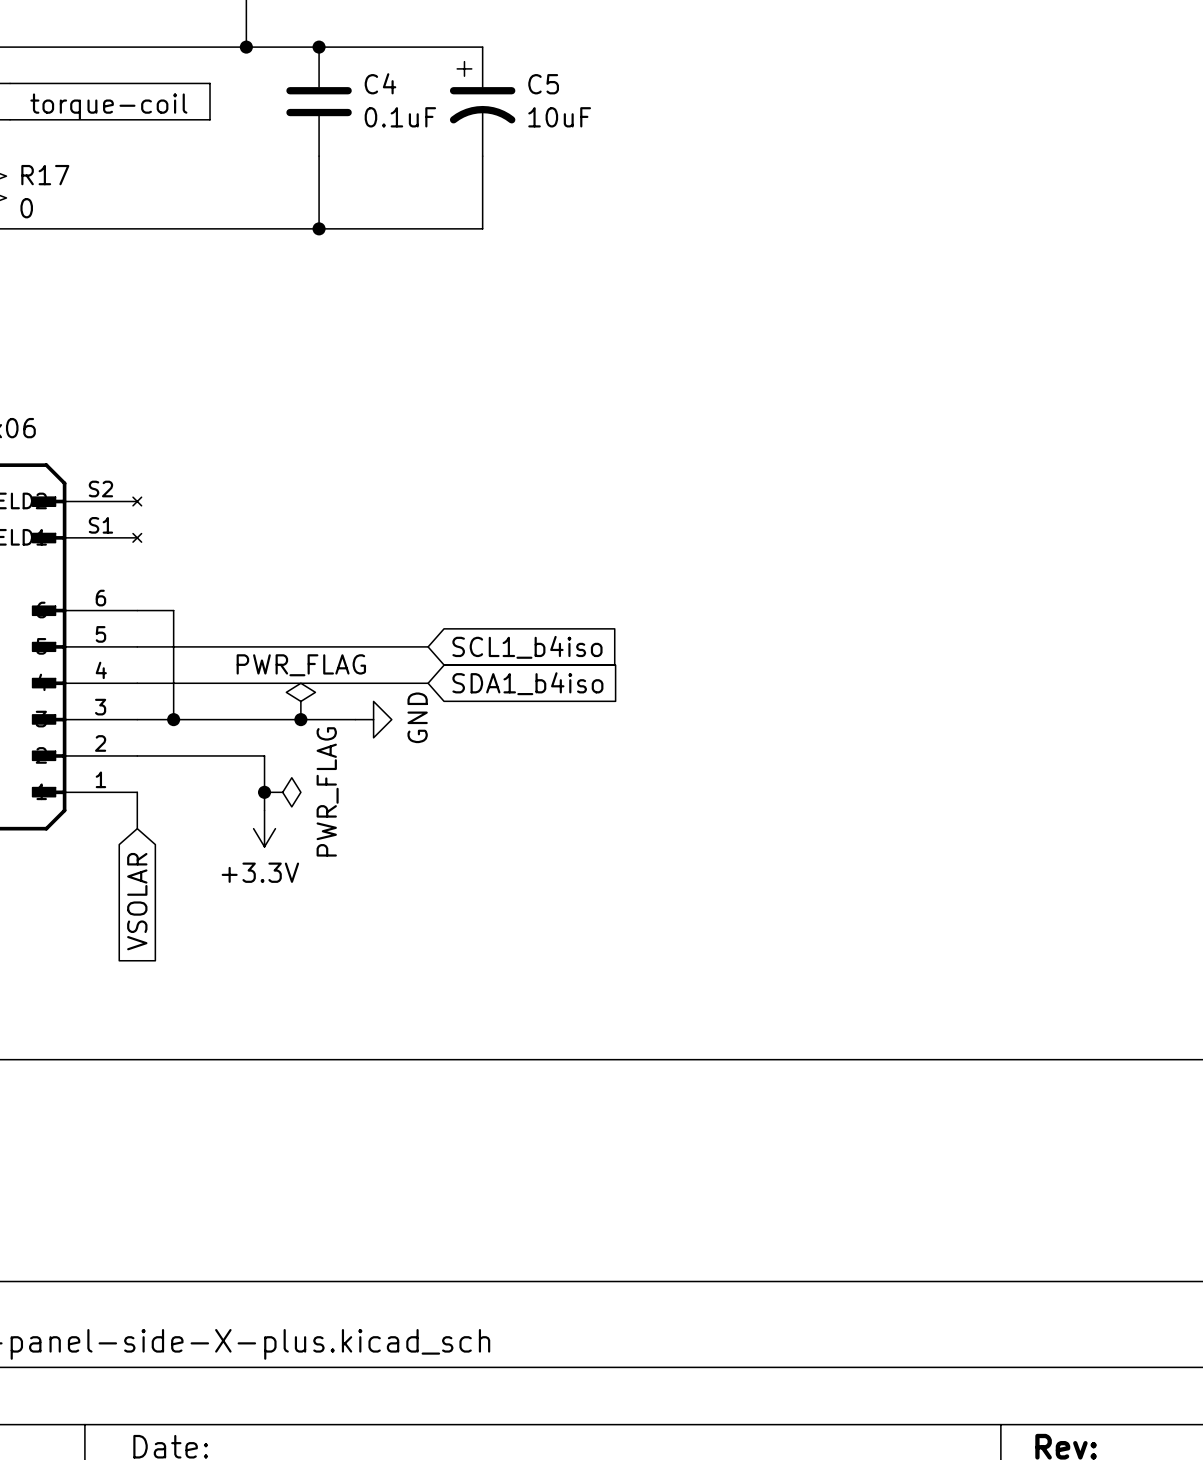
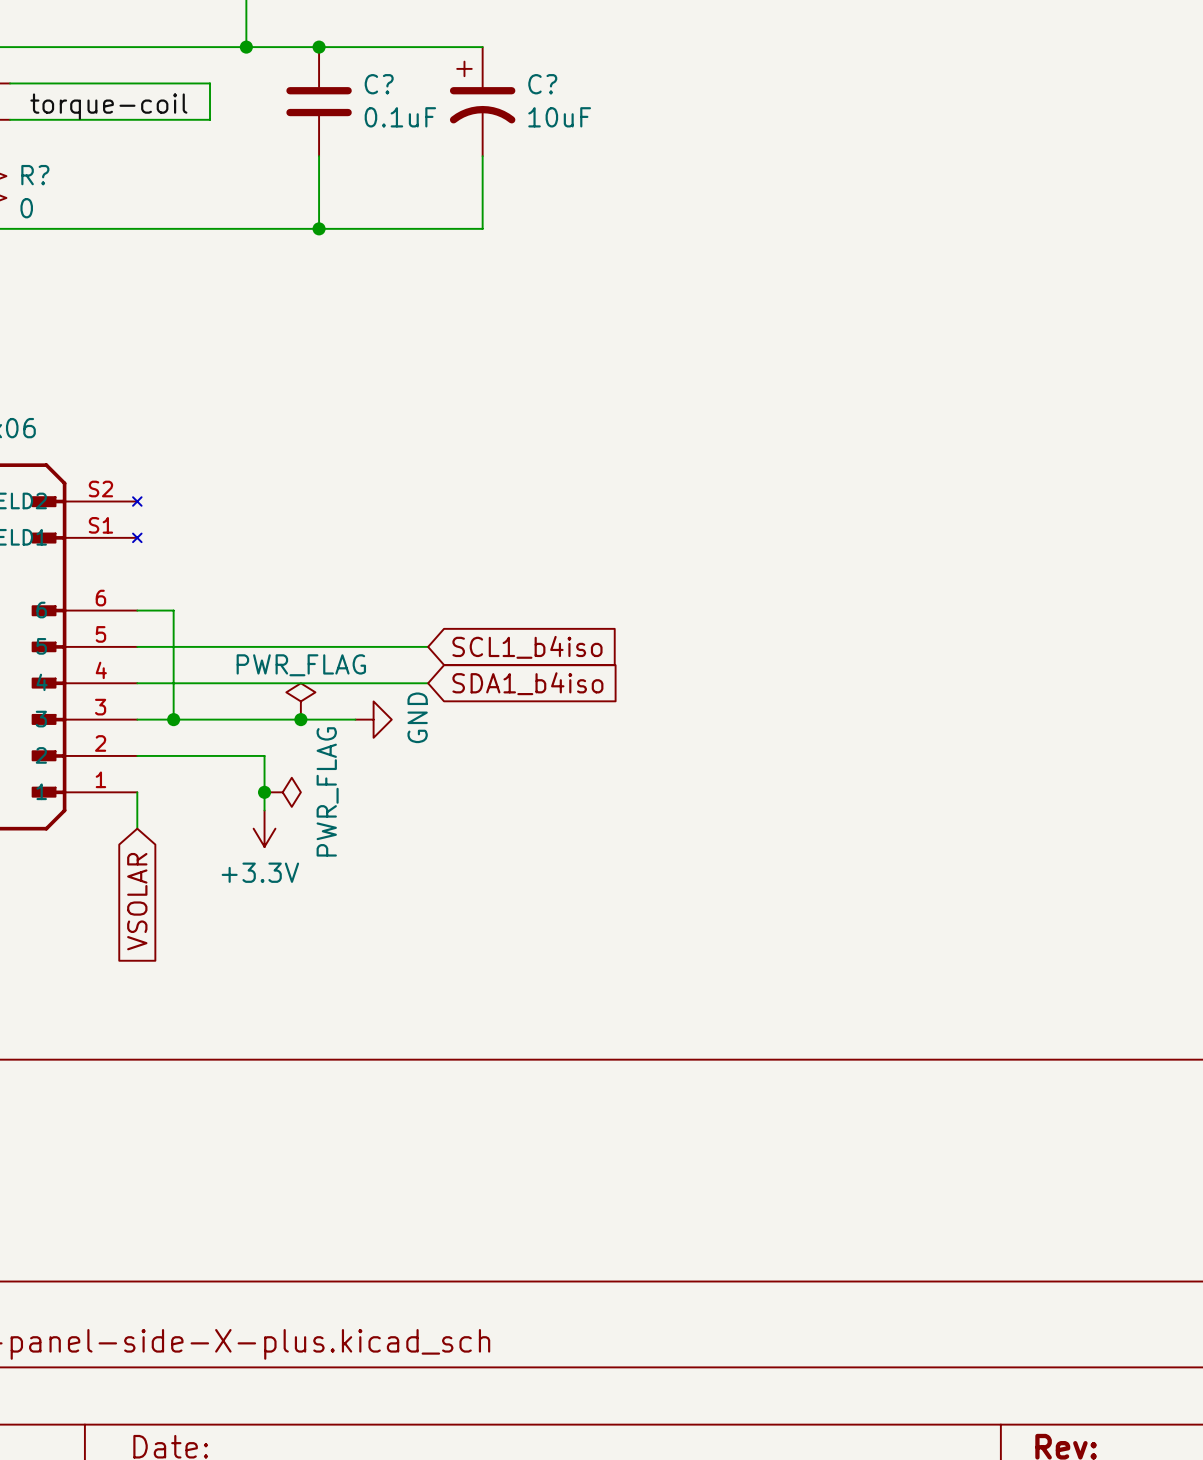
C4 name: C4 (380, 83) -> C? (379, 84)
C5 name: C5 (543, 84) -> C? (542, 84)
R17 name: R17 (45, 175) -> R? (35, 175)

